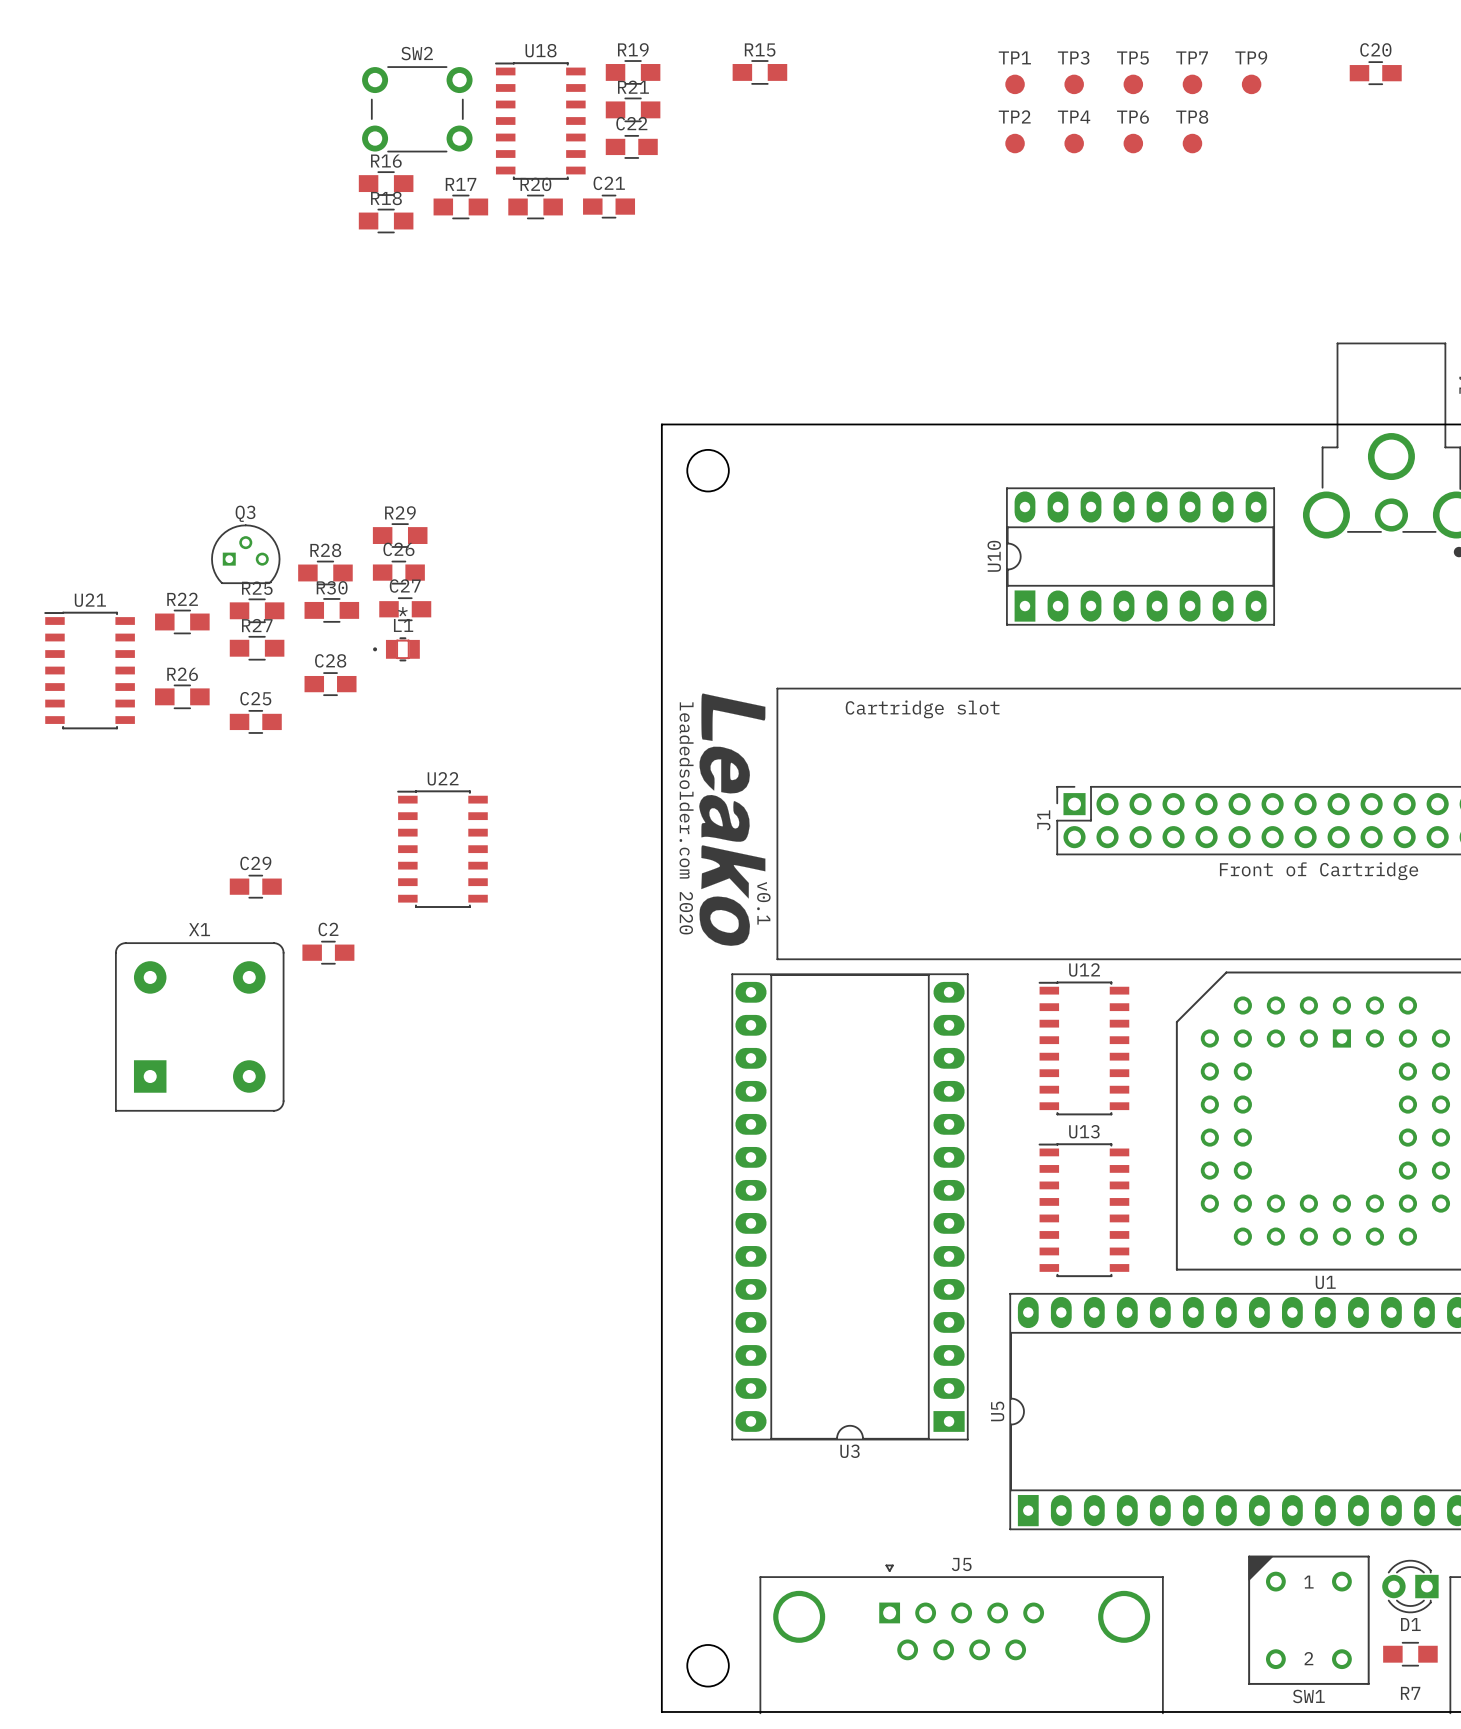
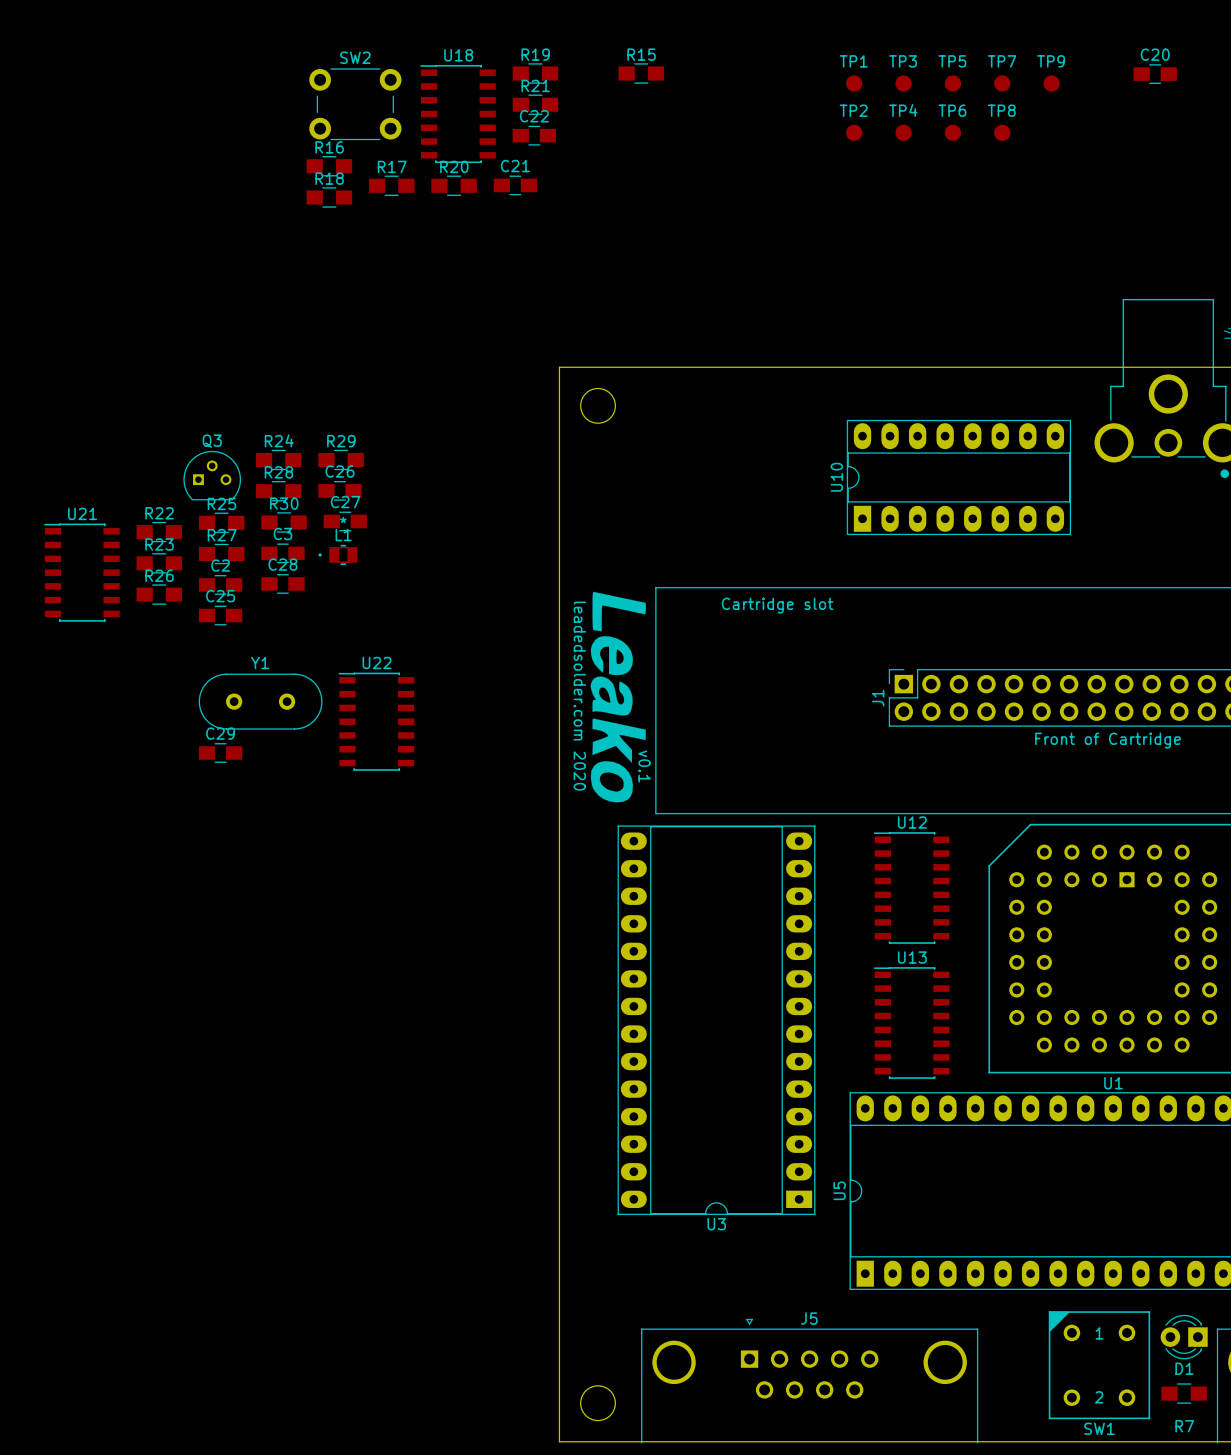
R24: none -> (278, 459)
C3: none -> (282, 553)
R23: none -> (159, 563)
Y1: none -> (260, 701)
C2 position: (328, 952) -> (220, 584)
X1: (199, 1026) -> none

